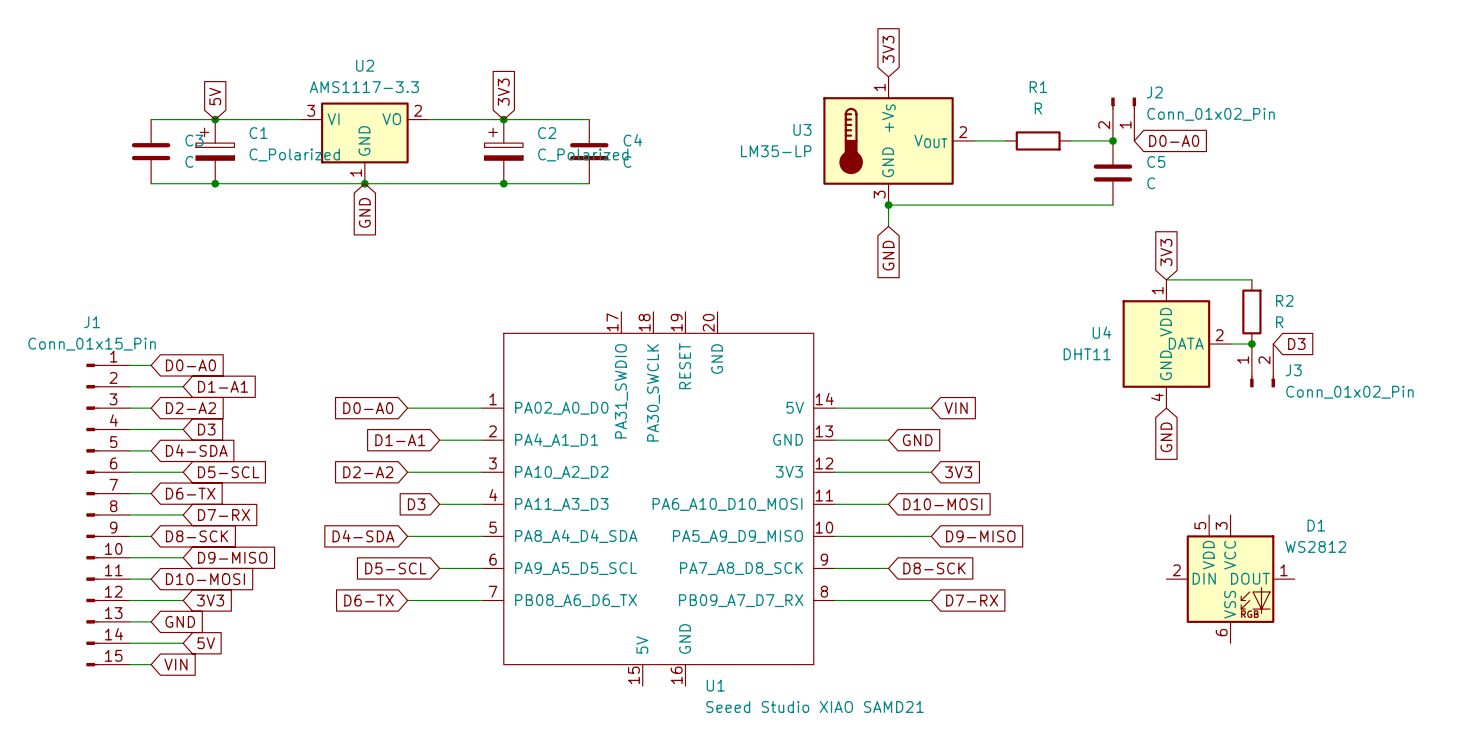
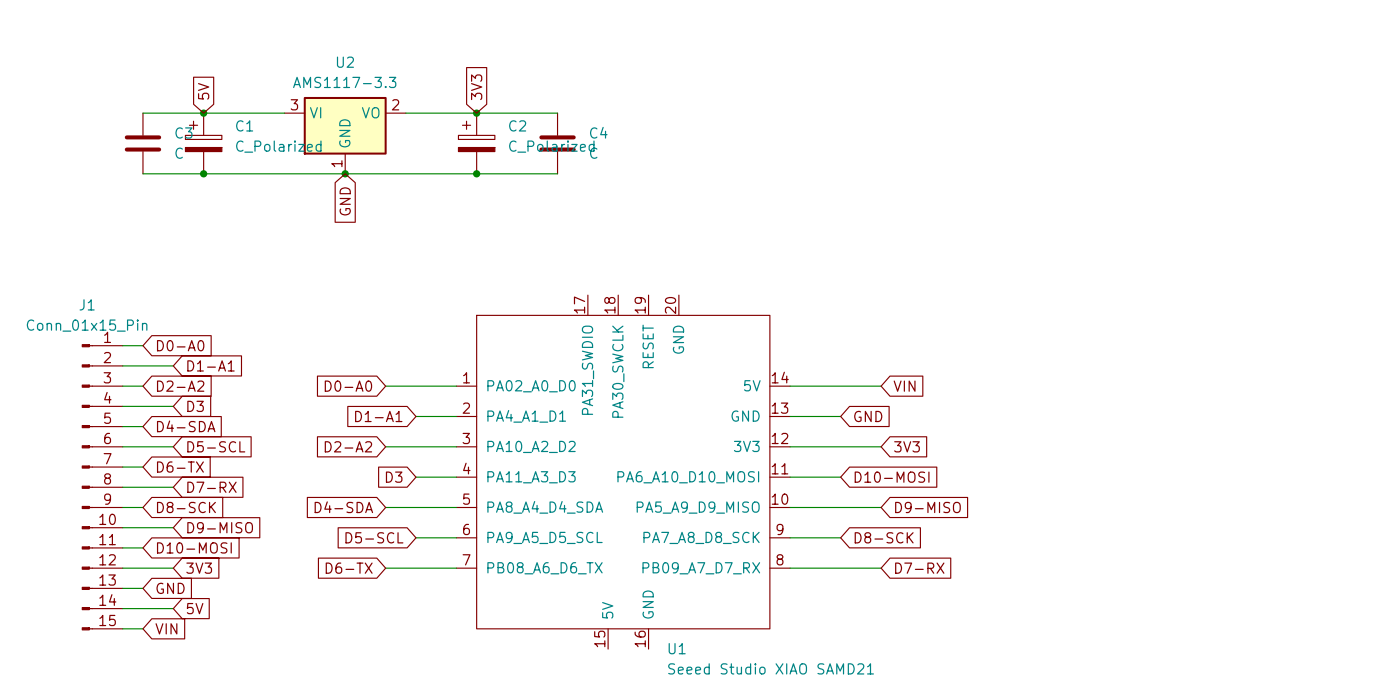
global label: 3V3 (888, 49) -> none
J2: Conn_01x02_Pin (1123, 119) -> none
U3: LM35-LP (898, 140) -> none
wire: (974, 140) (1006, 140) -> none
R1: R (1038, 140) -> none
wire: (1070, 140) (1112, 140) -> none
junction: (1112, 140) -> none
global label: D0-A0 (1174, 140) -> none
C5: C (1112, 173) -> none
junction: (888, 205) -> none
wire: (1112, 205) (888, 205) (888, 226) -> none
global label: 3V3 (1166, 252) -> none
global label: GND (888, 255) -> none
wire: (1166, 279) (1251, 279) -> none
R2: R (1251, 311) -> none
U4: DHT11 (1176, 344) -> none
wire: (1230, 344) (1251, 344) -> none
junction: (1251, 344) -> none
global label: D3 (1296, 344) -> none
J3: Conn_01x02_Pin (1262, 365) -> none
global label: GND (1166, 437) -> none
D1: WS2812 (1230, 579) -> none

